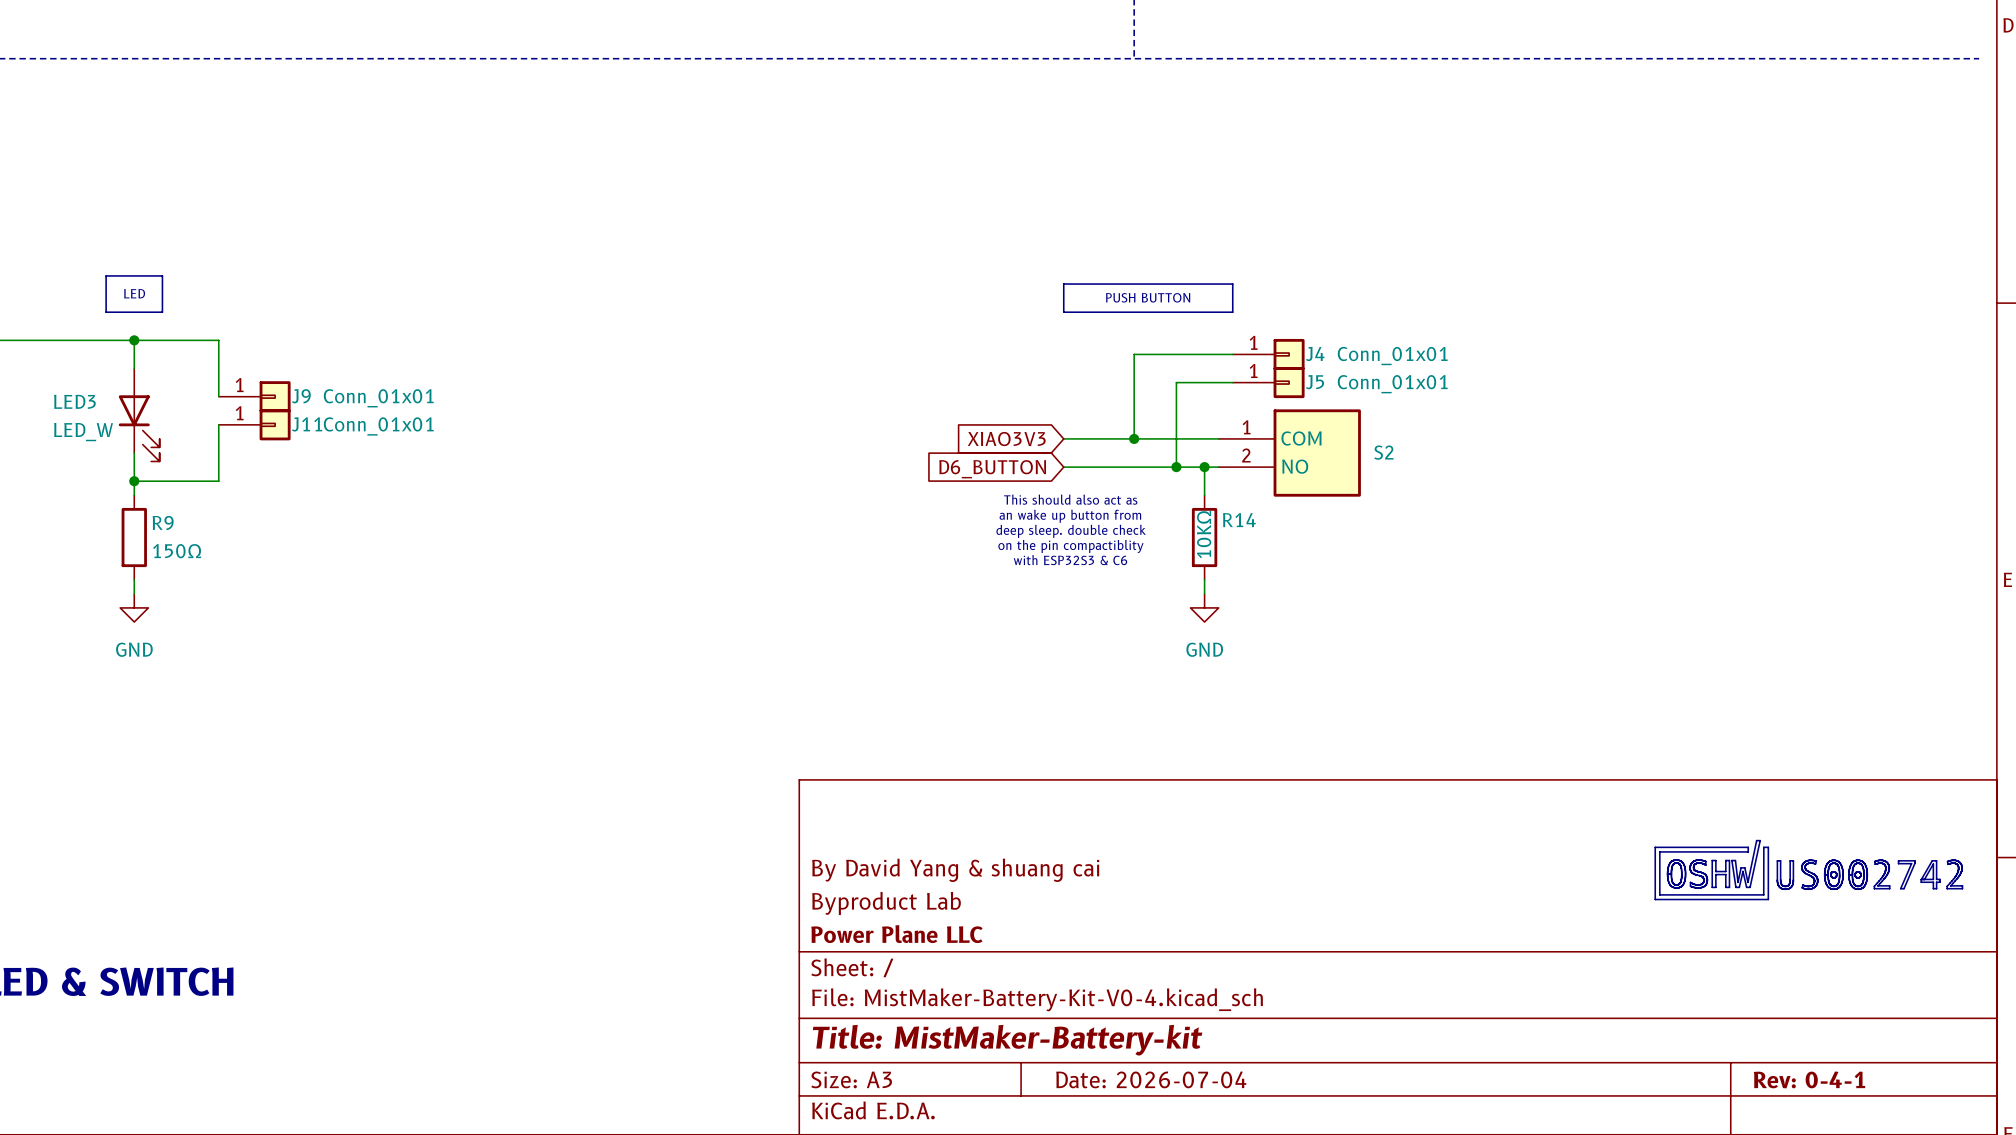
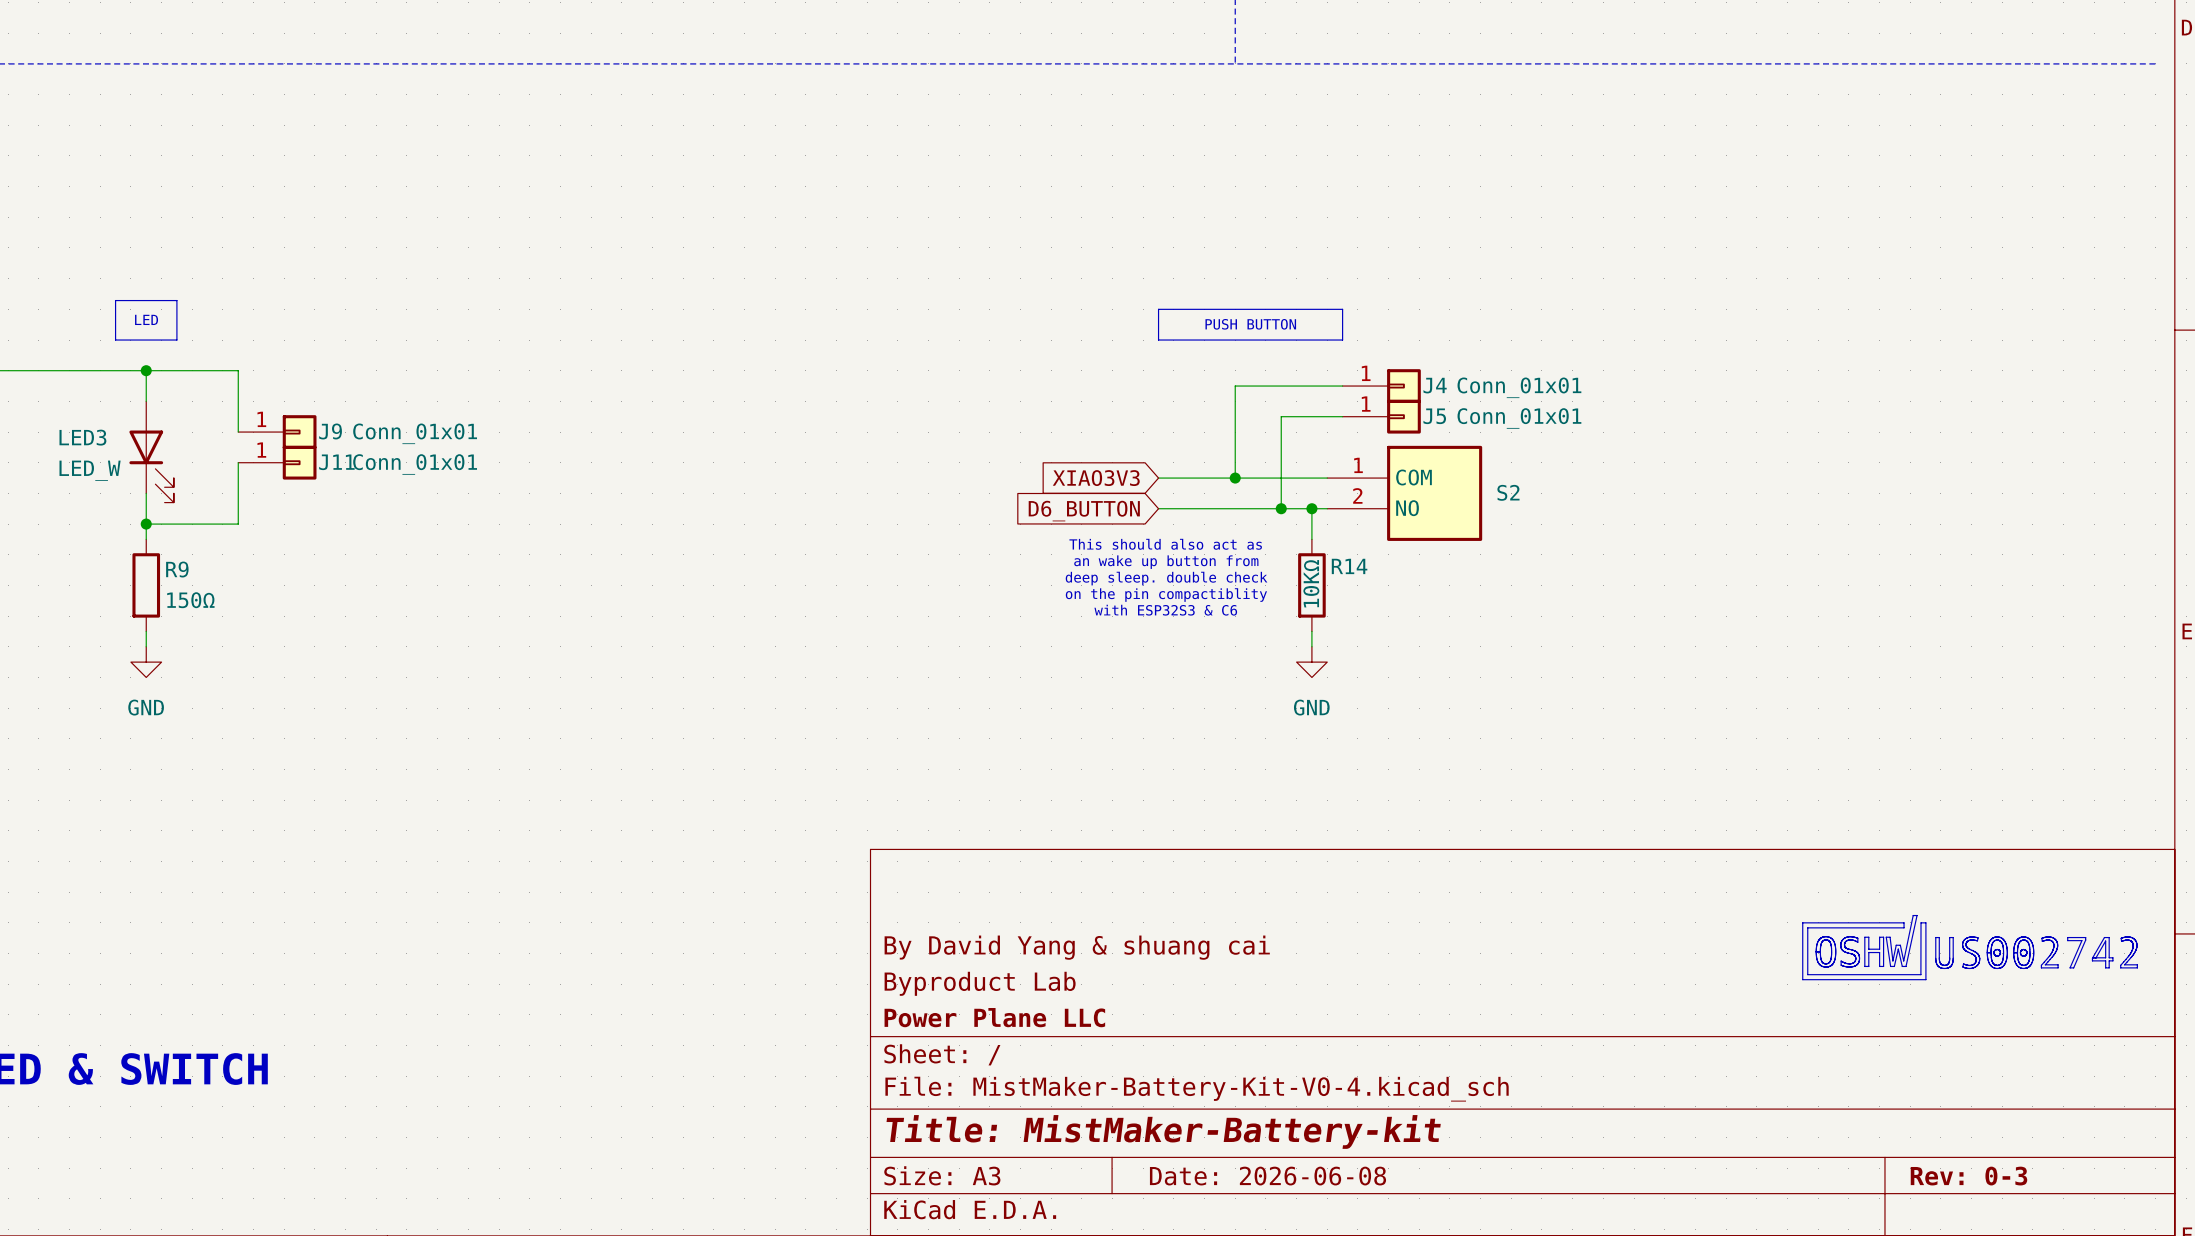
title block: Date: 2026-07-04 (1151, 1079) -> Date: 2026-06-08 (1267, 1176)
title block: Rev: 0-4-1 (1809, 1079) -> Rev: 0-3 (1968, 1176)

